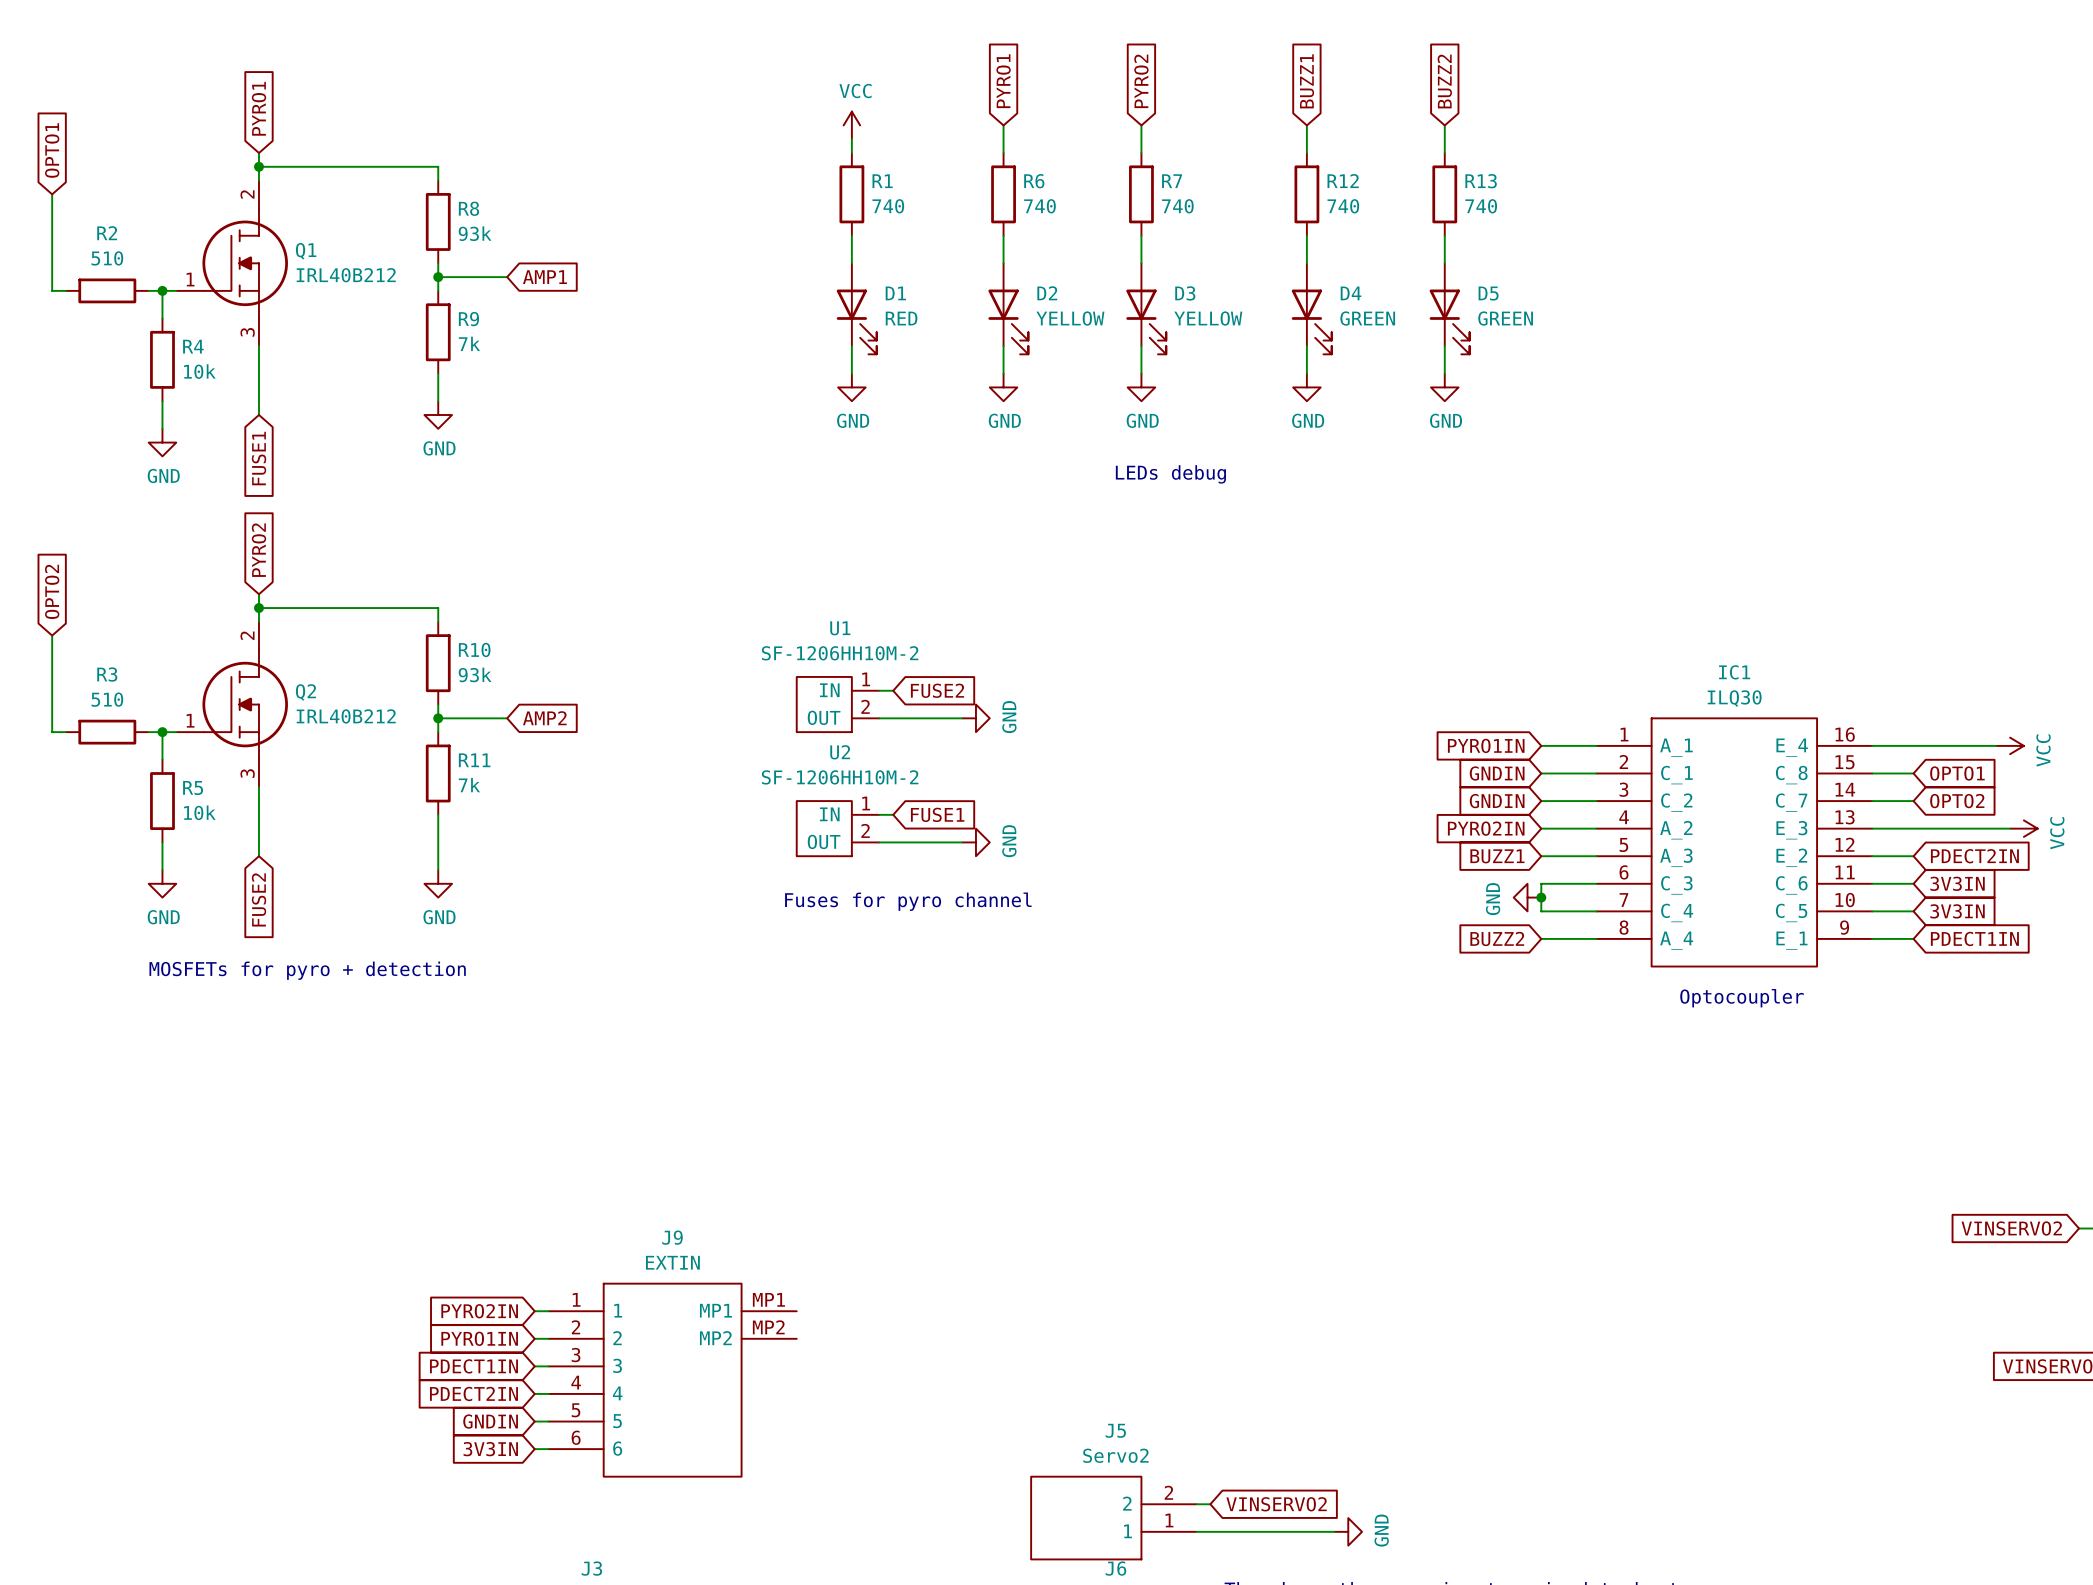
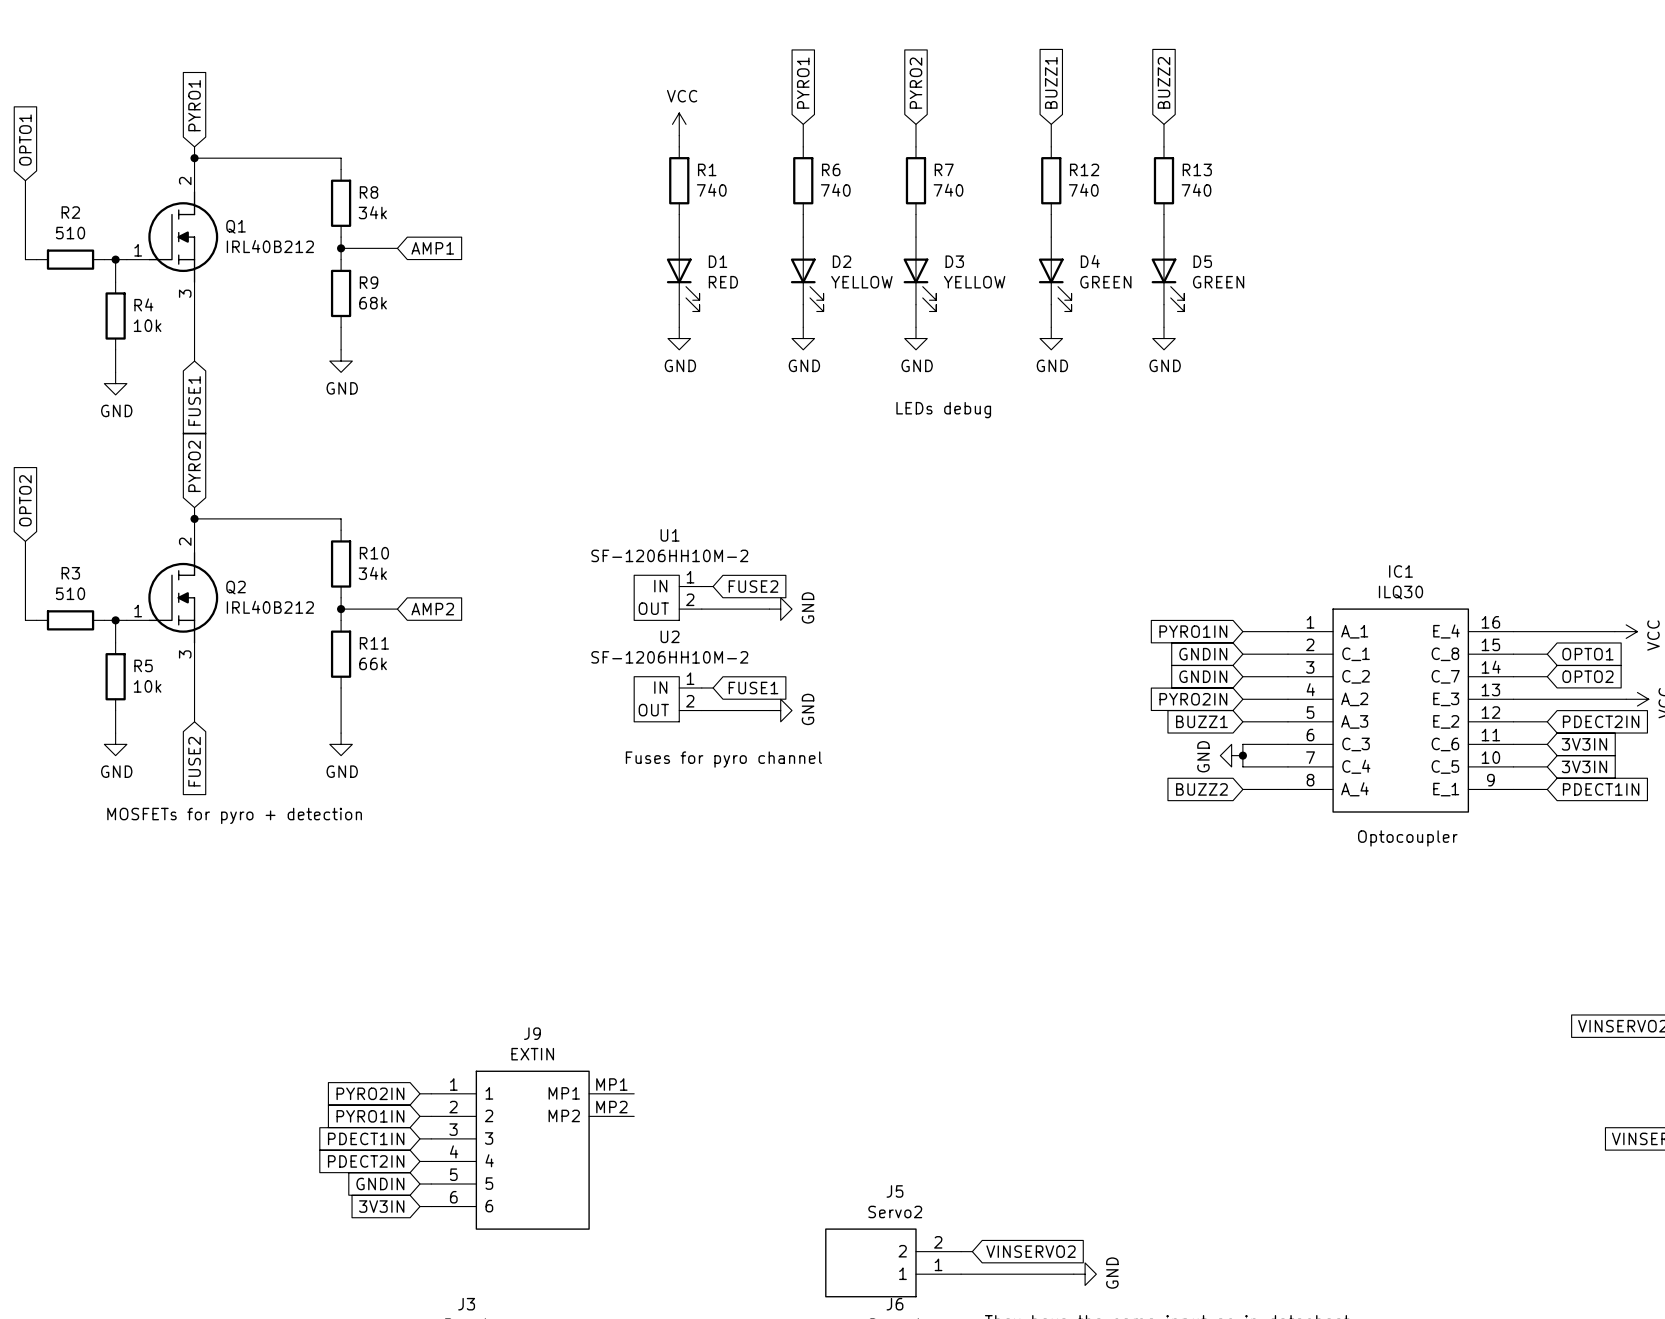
R8 value: 93k (475, 233) -> 34k (372, 212)
R9 value: 7k (469, 343) -> 68k (373, 303)
R10 value: 93k (475, 674) -> 34k (372, 573)
R11 value: 7k (469, 785) -> 66k (373, 663)

